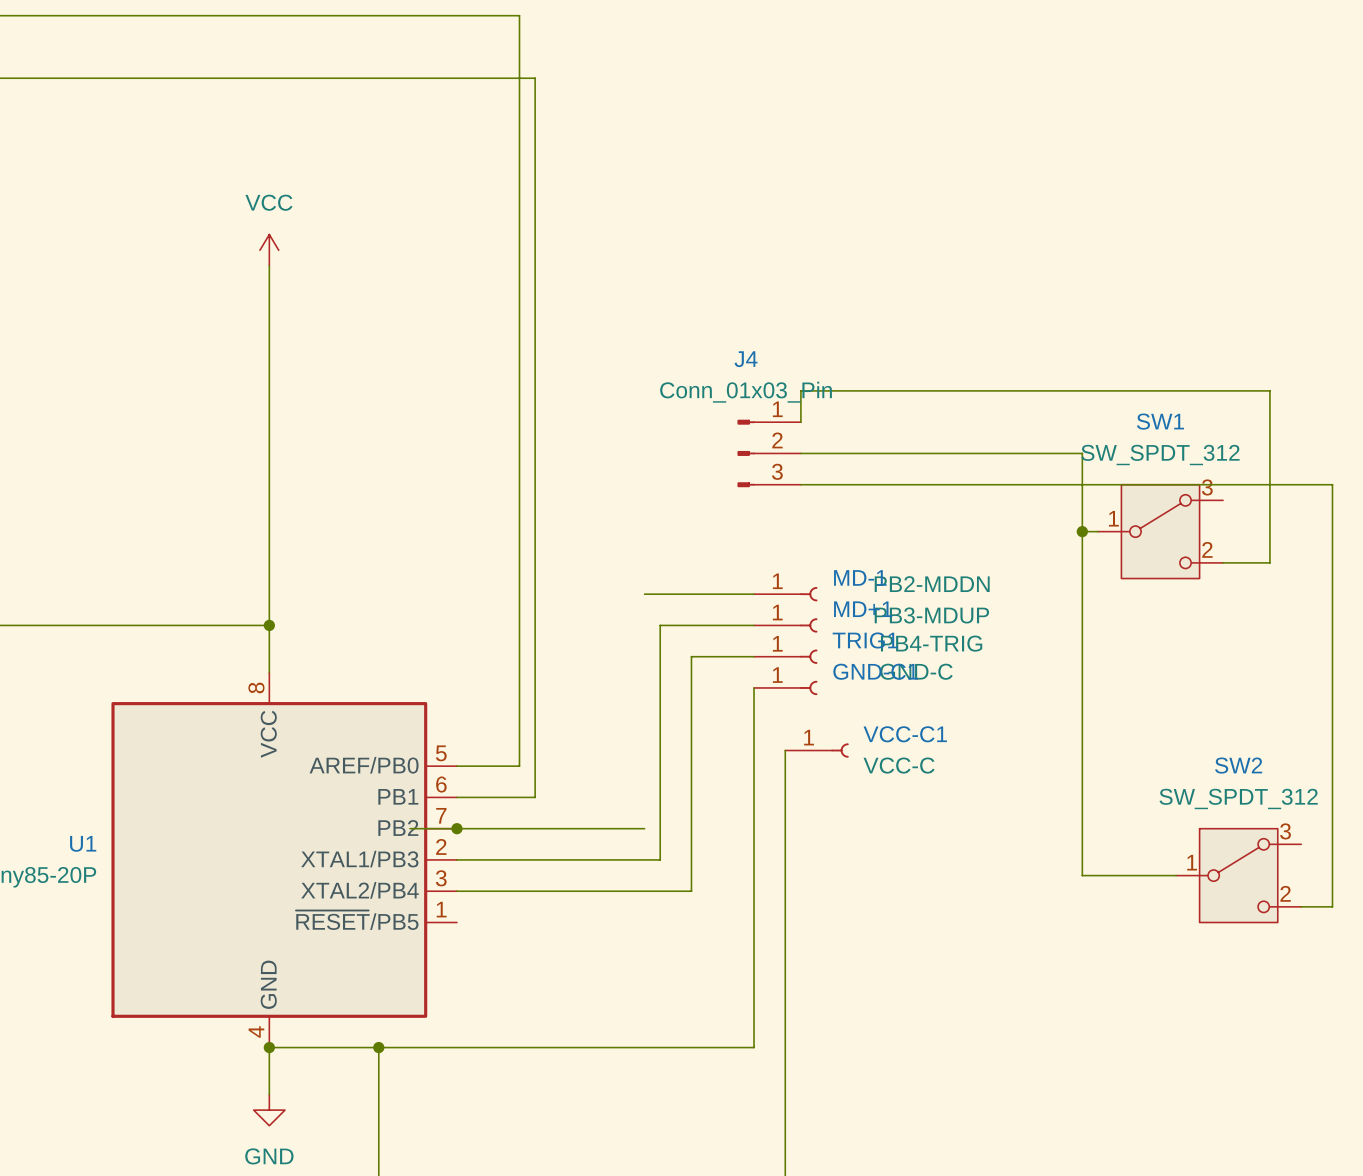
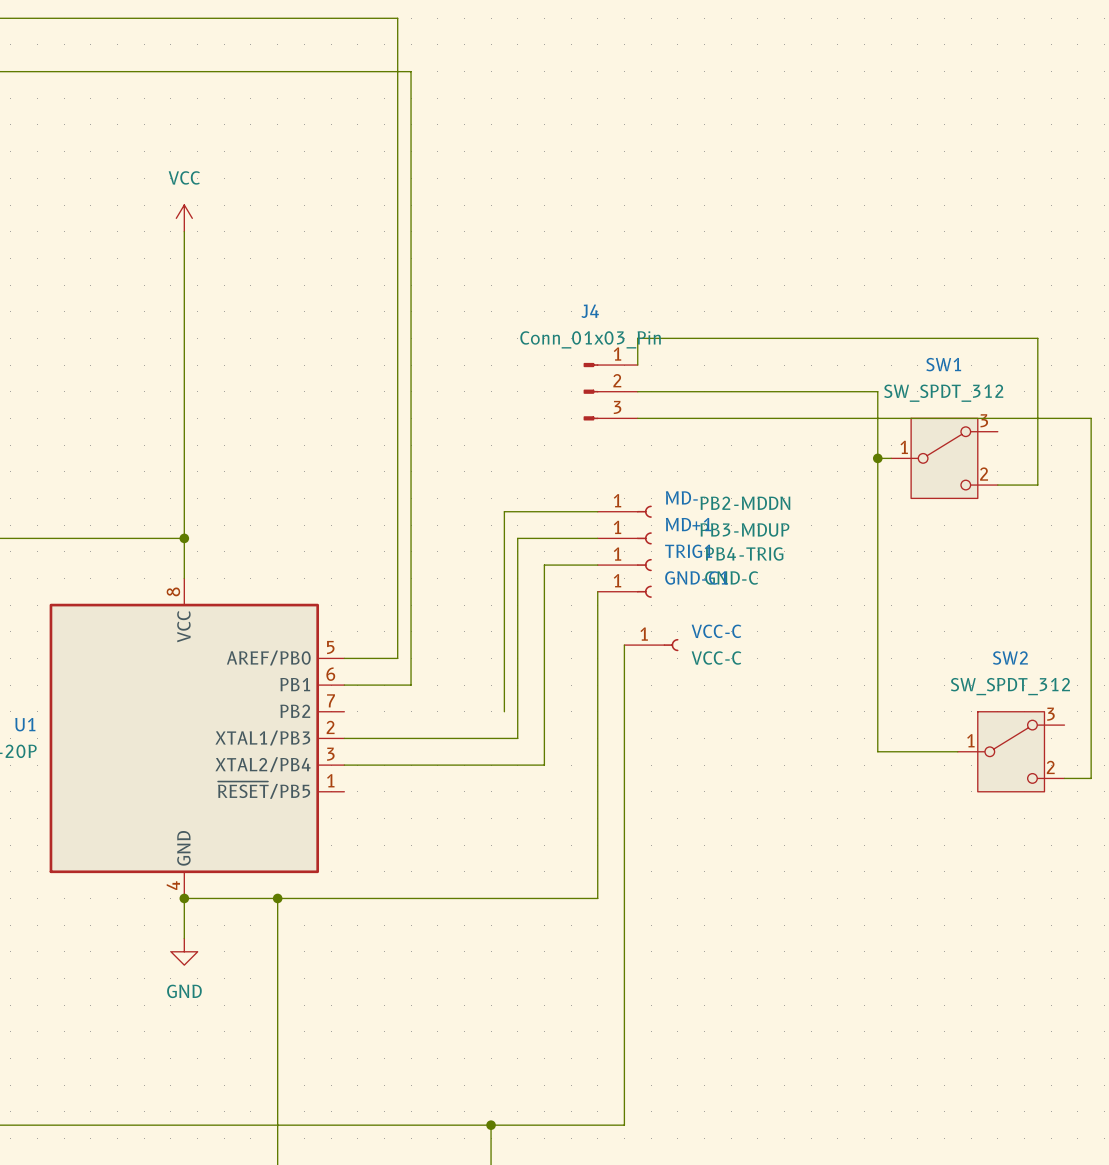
MD-1 name: MD-1 (860, 577) -> MD- (681, 497)
VCC-C1 name: VCC-C1 (905, 734) -> VCC-C (716, 631)
wire: (410, 828) (644, 828) -> (504, 511) (504, 711)
junction: (456, 828) -> none

